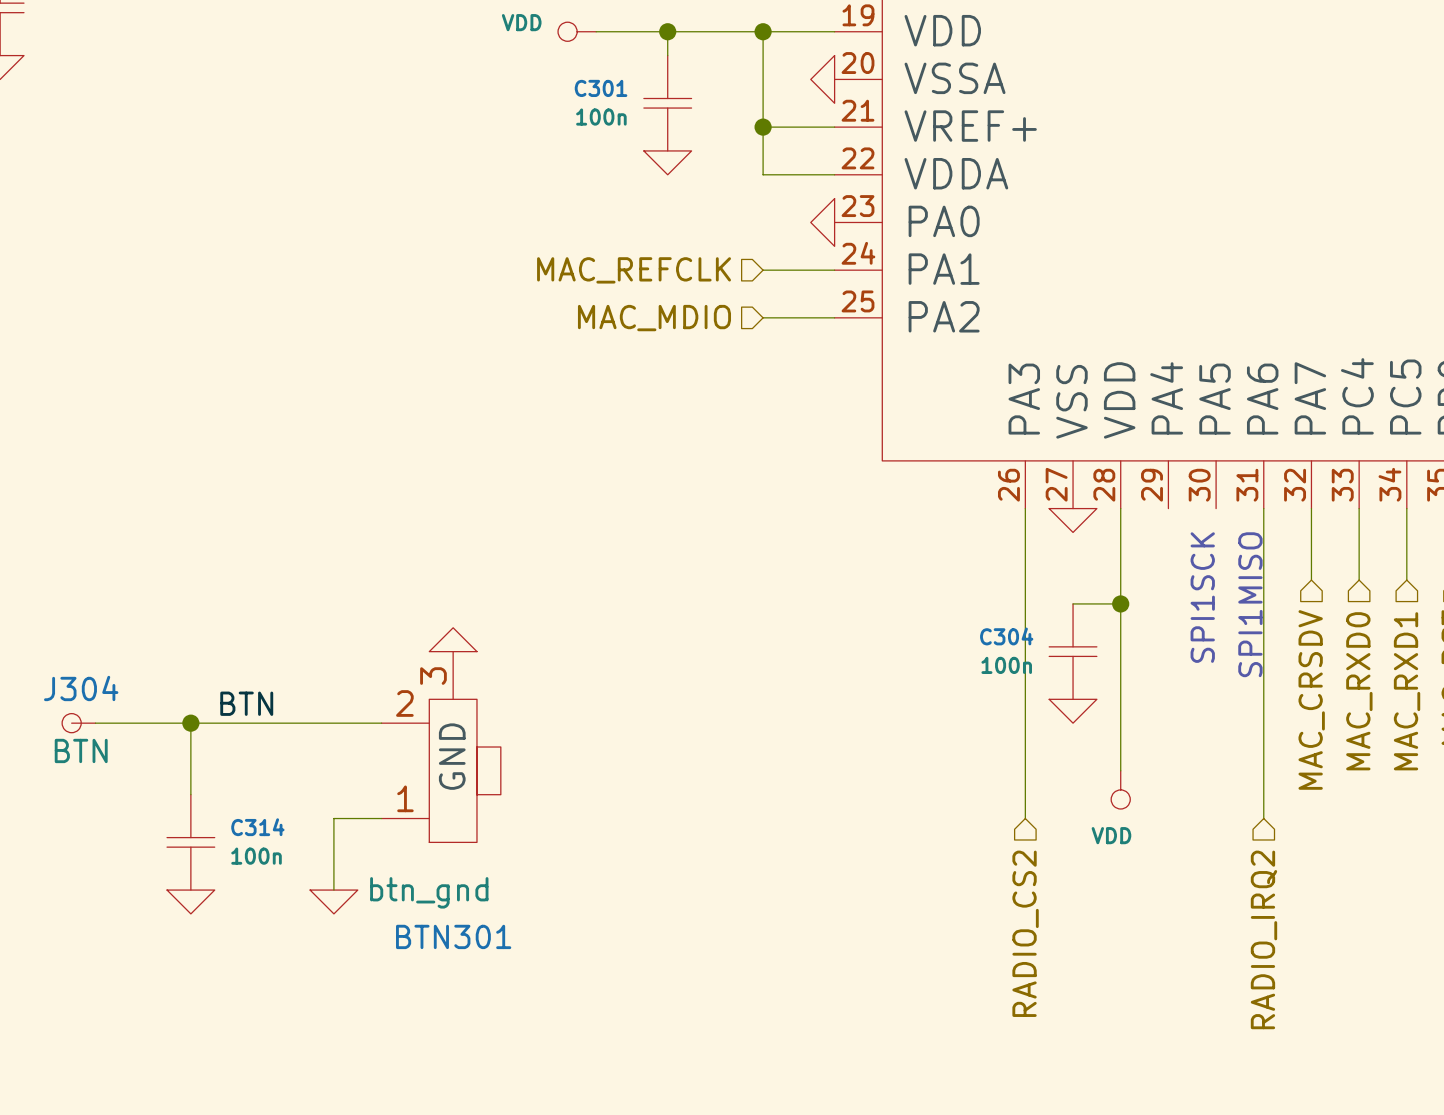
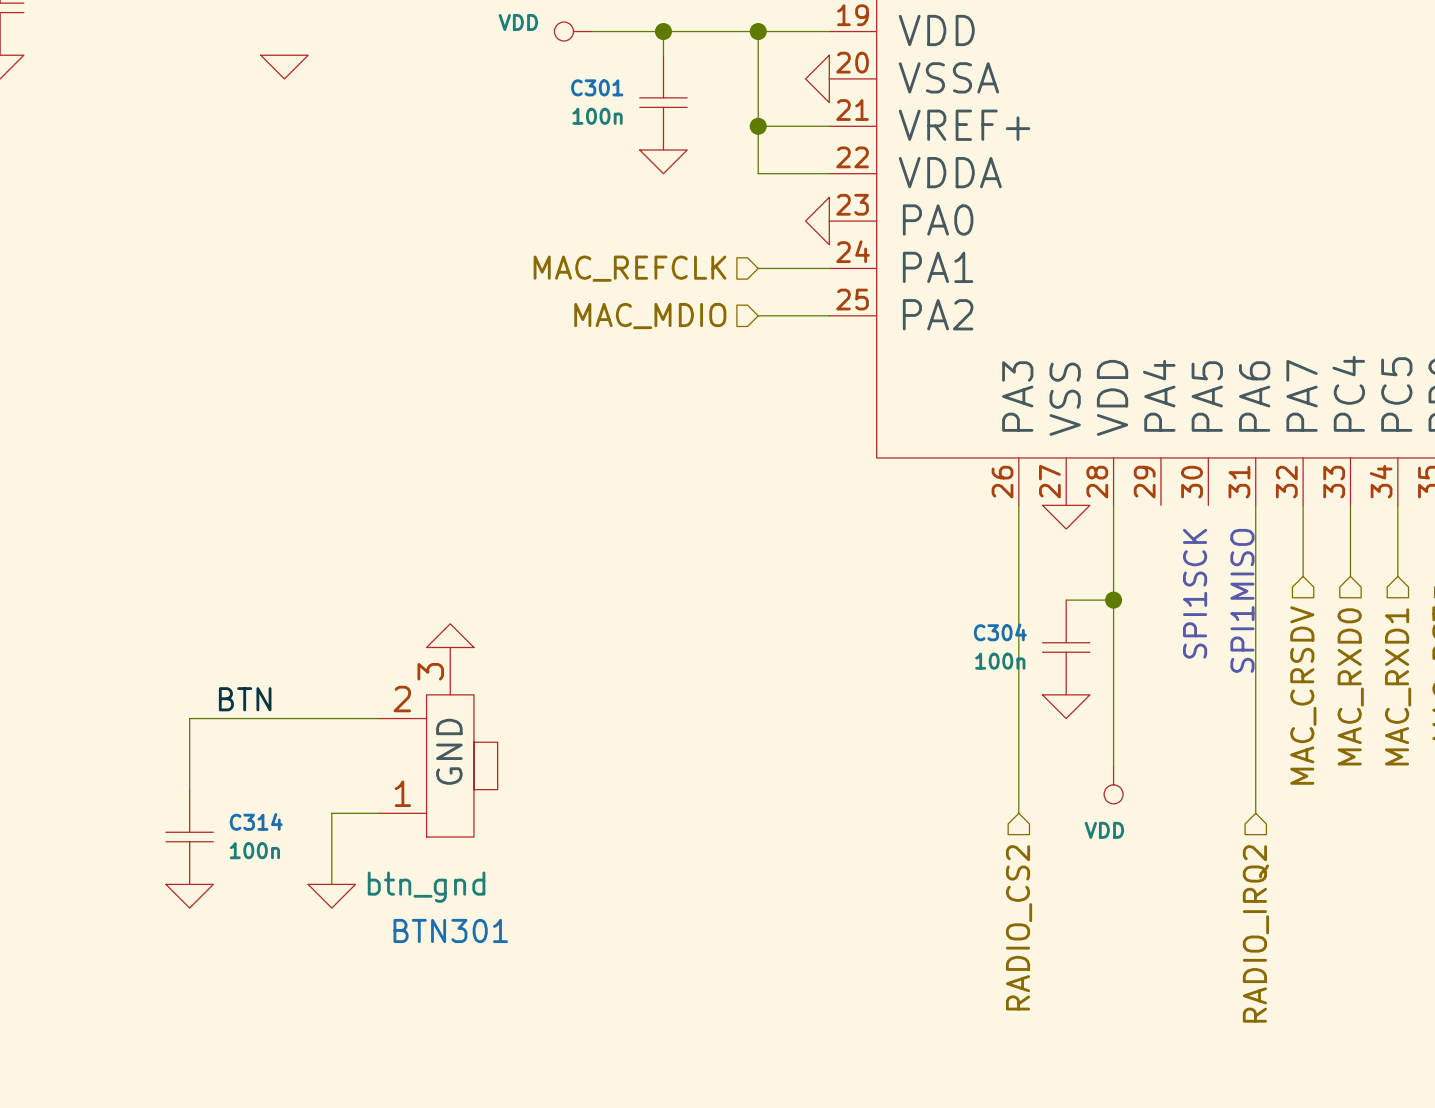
power symbol: none -> (284, 67)
J304: BTN (78, 723) -> none
wire: (95, 723) (190, 723) -> none
junction: (190, 723) -> none

